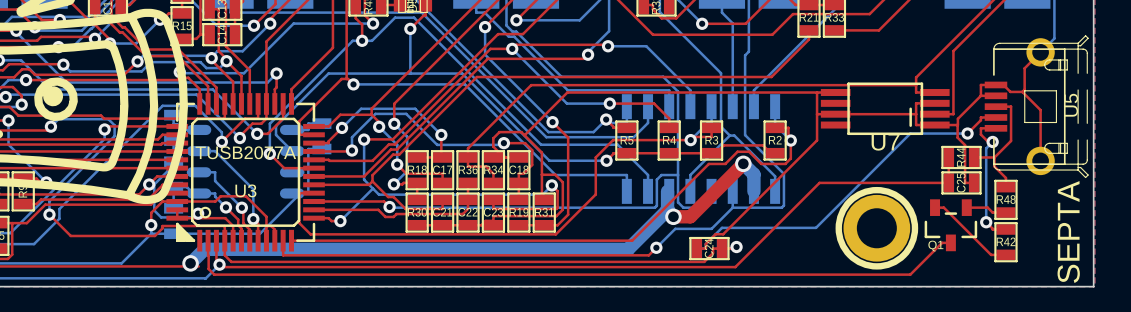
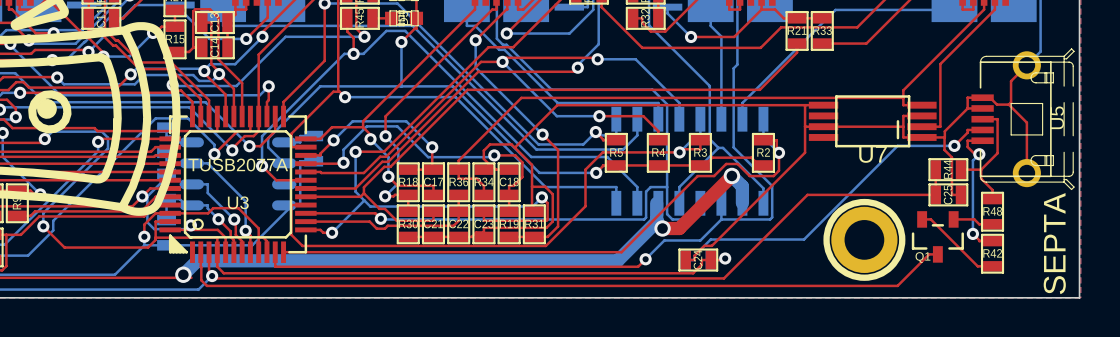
top track: (177, 209) (177, 218) -> (170, 221) (155, 221) (155, 237)

